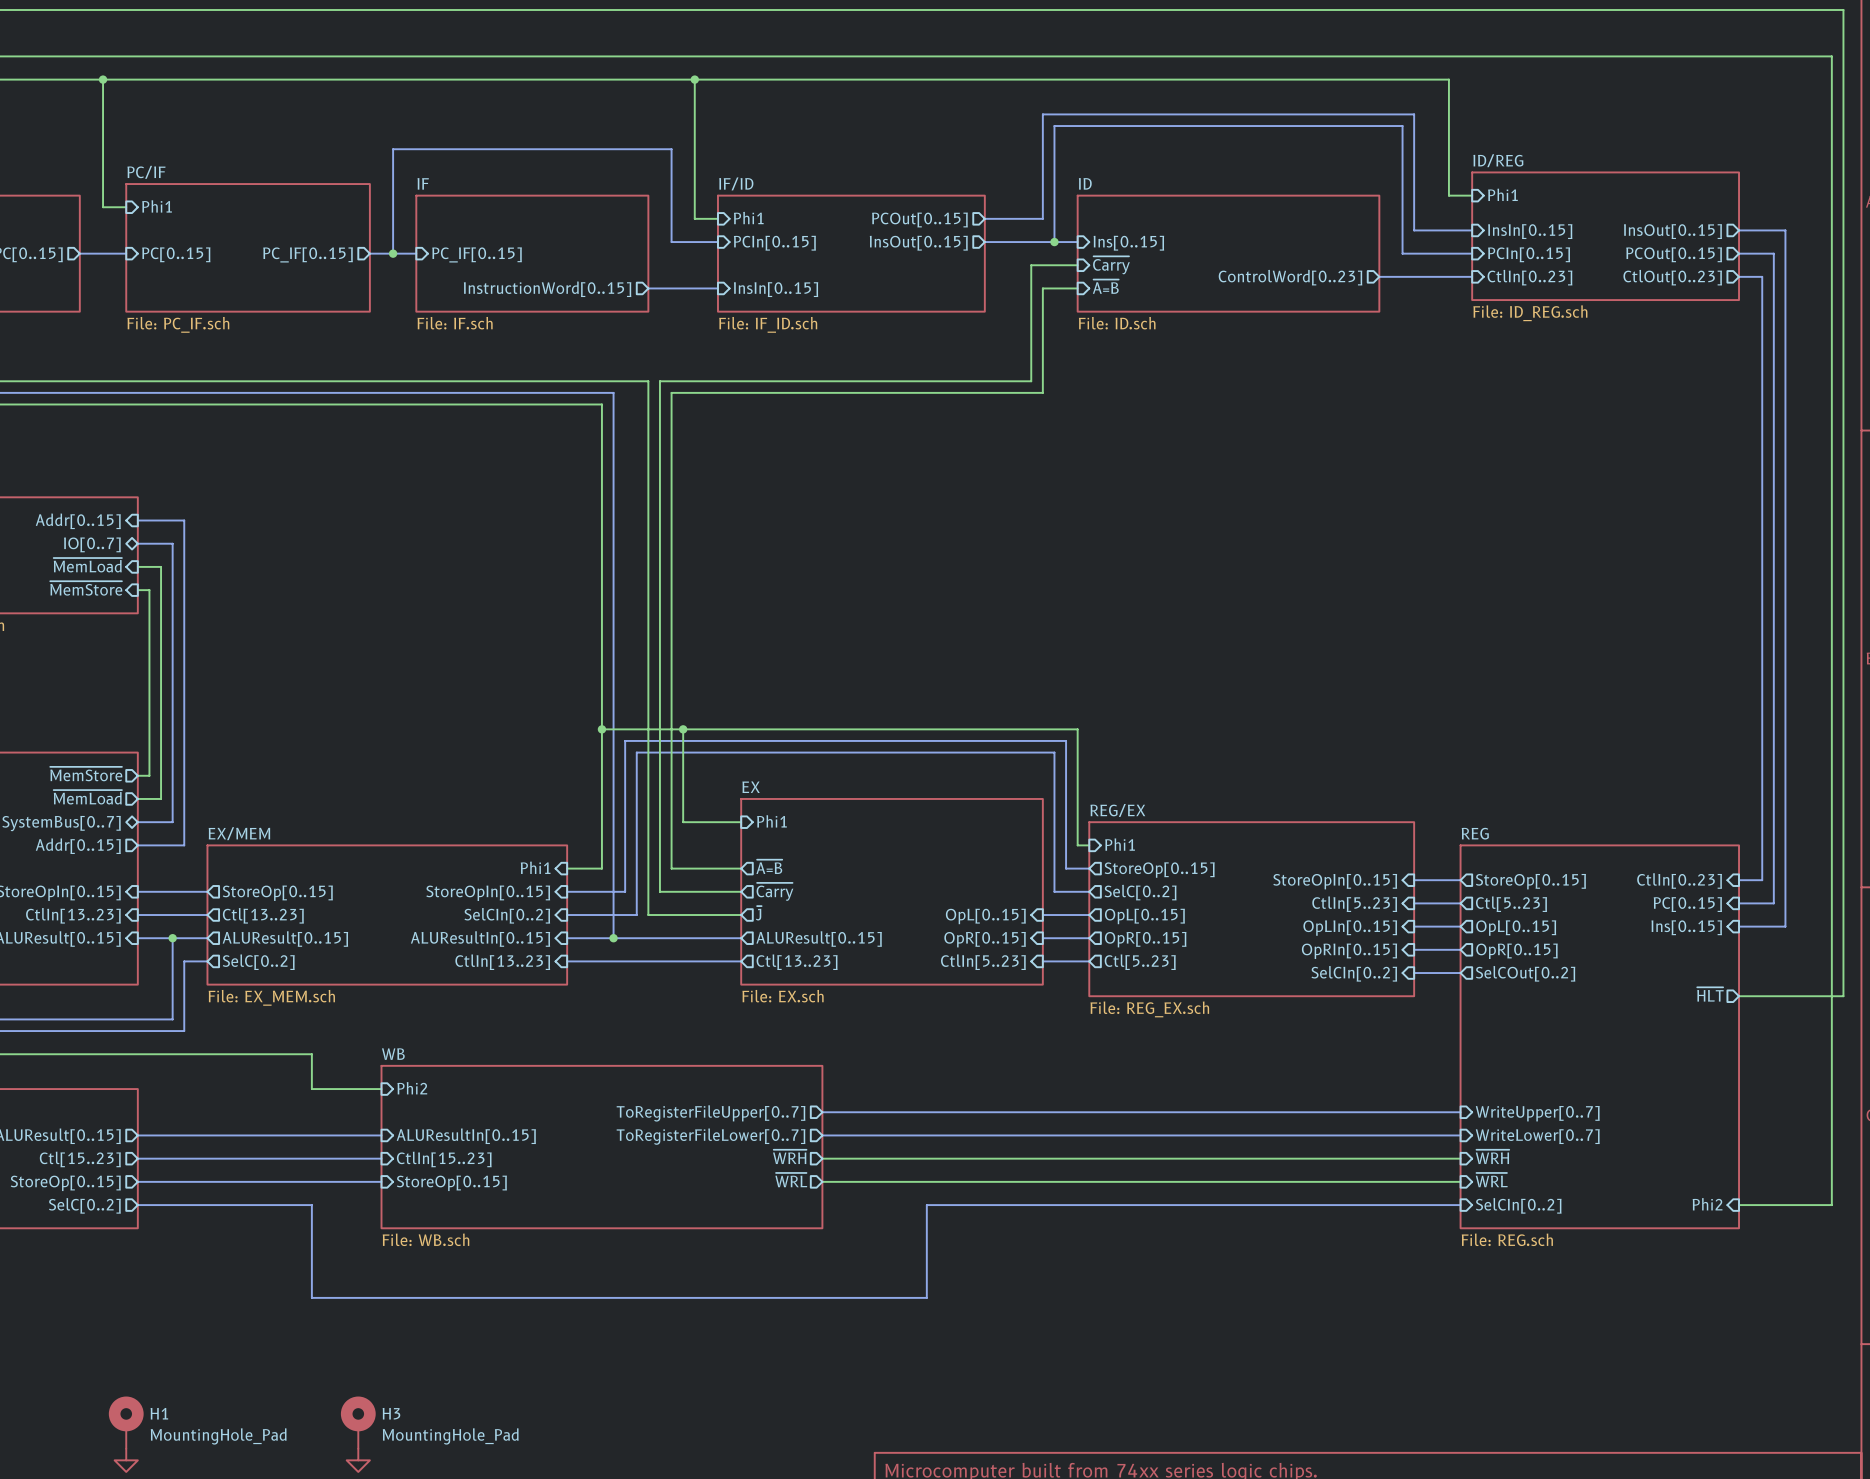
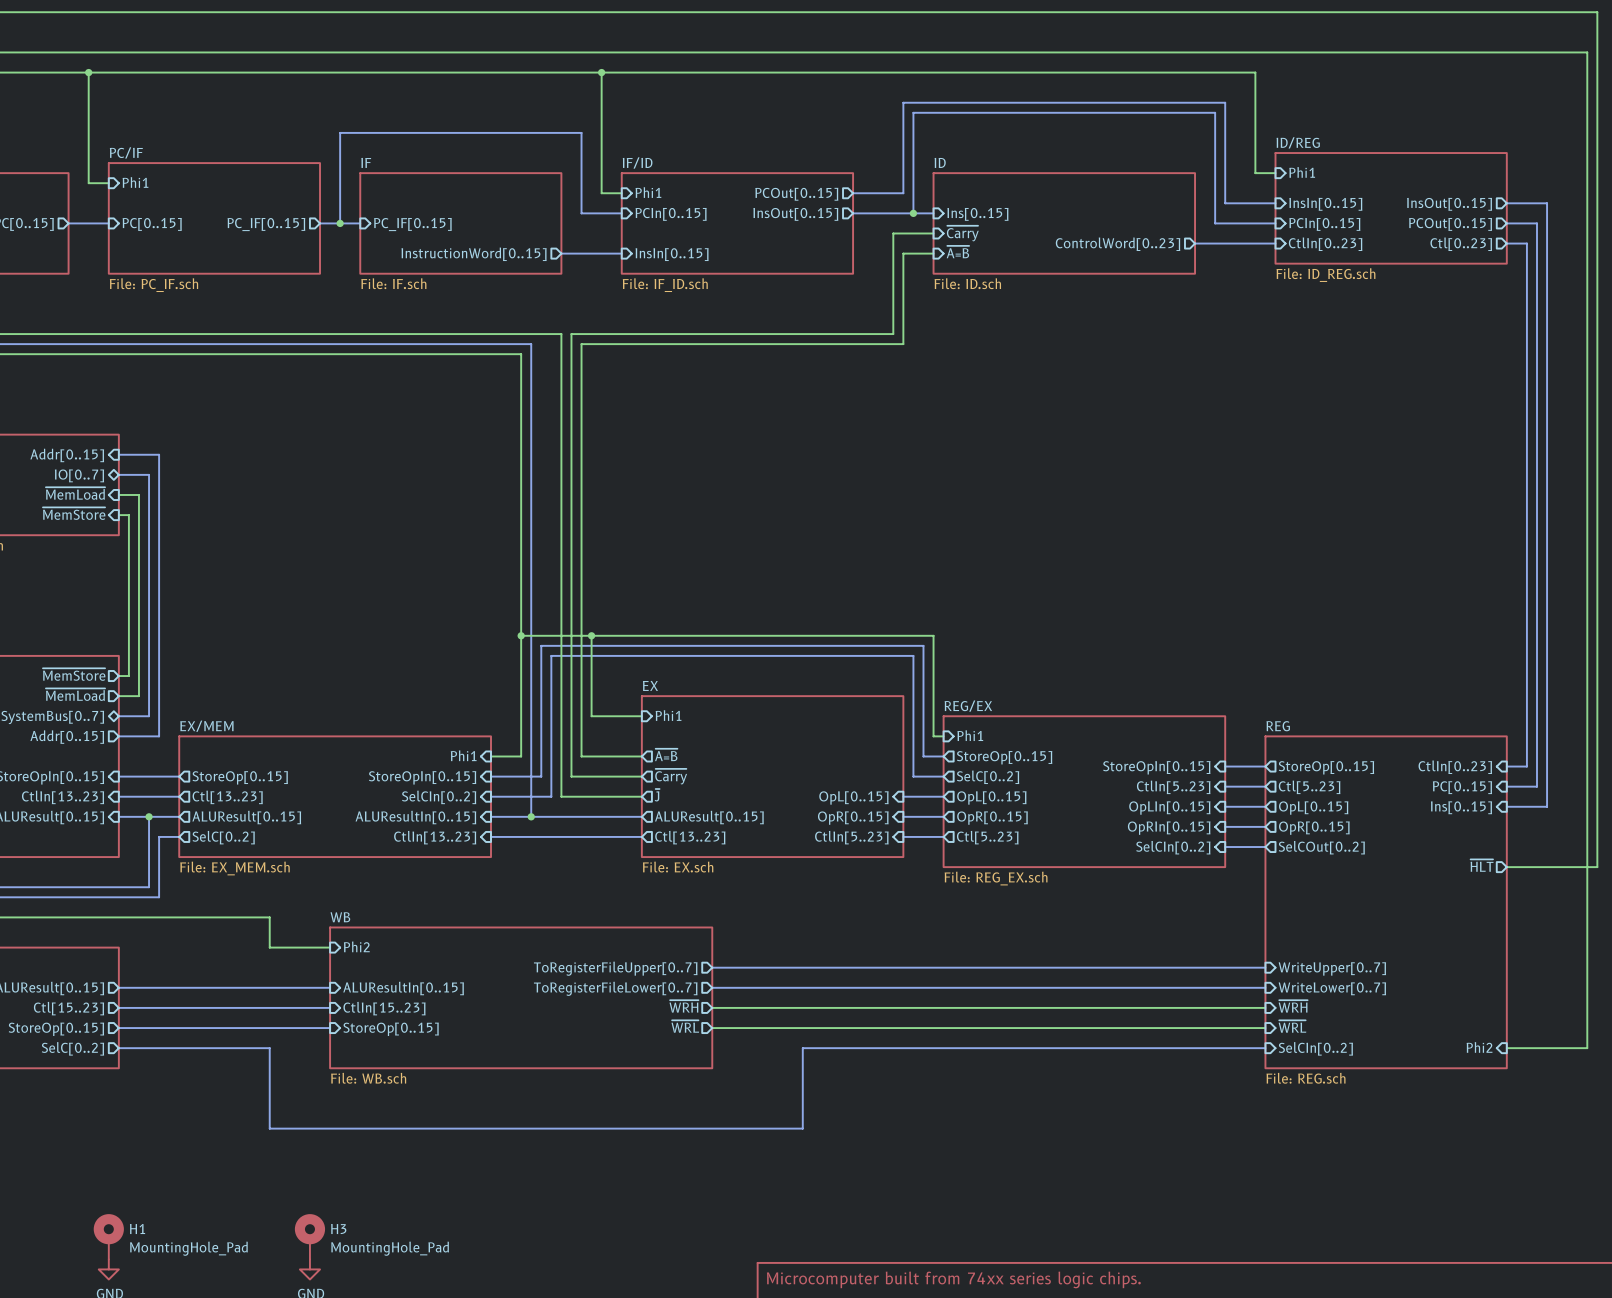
sheet pin: CtlOut[0..23] (1672, 277) -> Ctl[0..23] (1461, 244)

